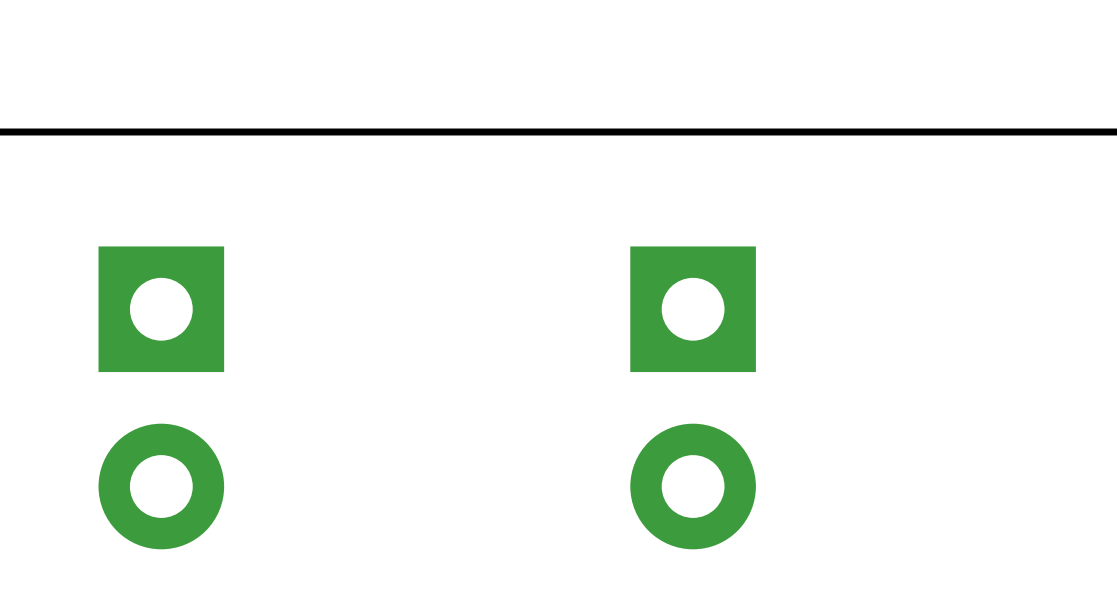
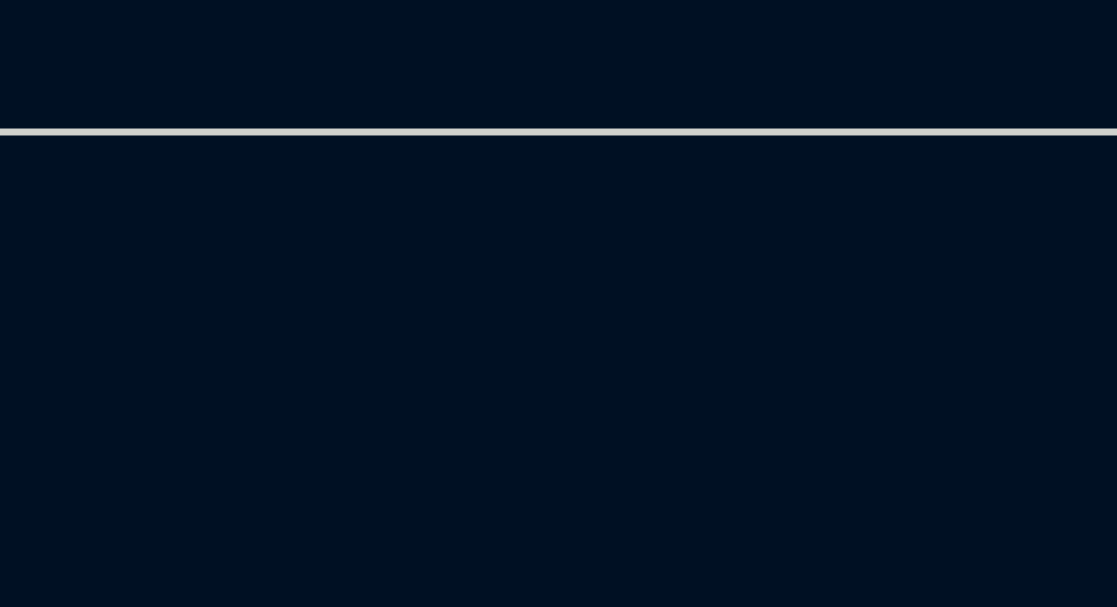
part: (161, 397) -> none
part: (693, 397) -> none

